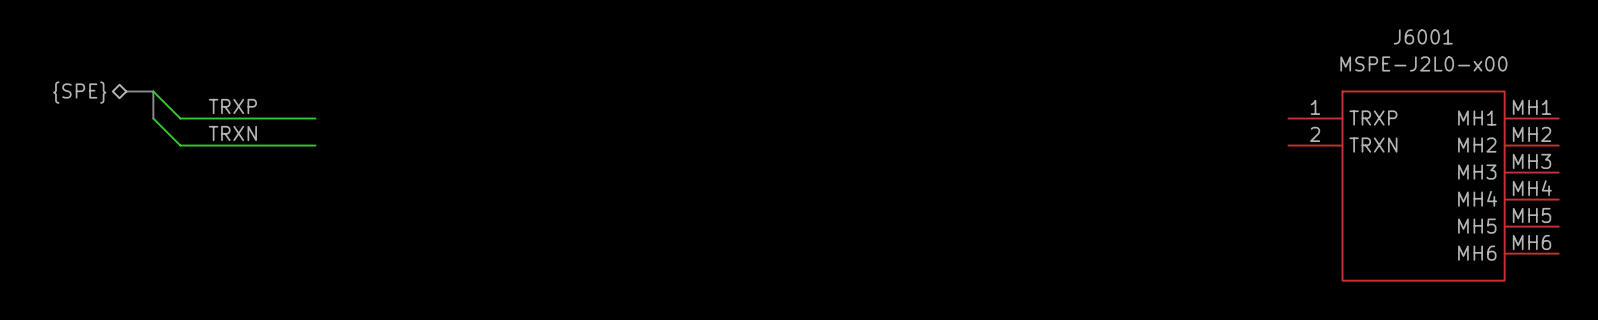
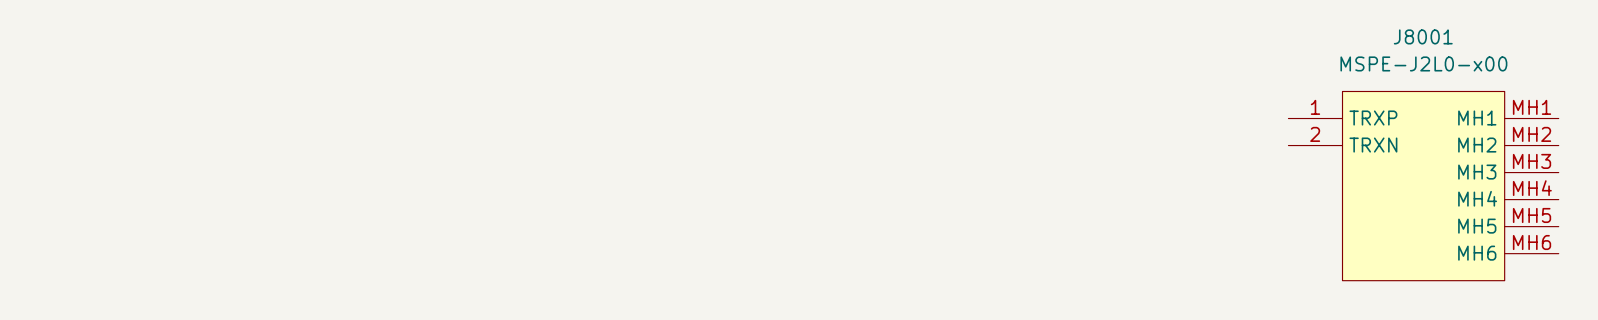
J6001 name: J6001 (1423, 36) -> J8001 (1423, 36)
bus: (126, 91) (153, 91) (153, 118) -> none
wire: (153, 91) (180, 118) (315, 118) -> none
hierarchical label: {SPE} (79, 92) -> none
label: TRXP (232, 106) -> none
wire: (153, 118) (180, 145) (315, 145) -> none
label: TRXN (232, 133) -> none

